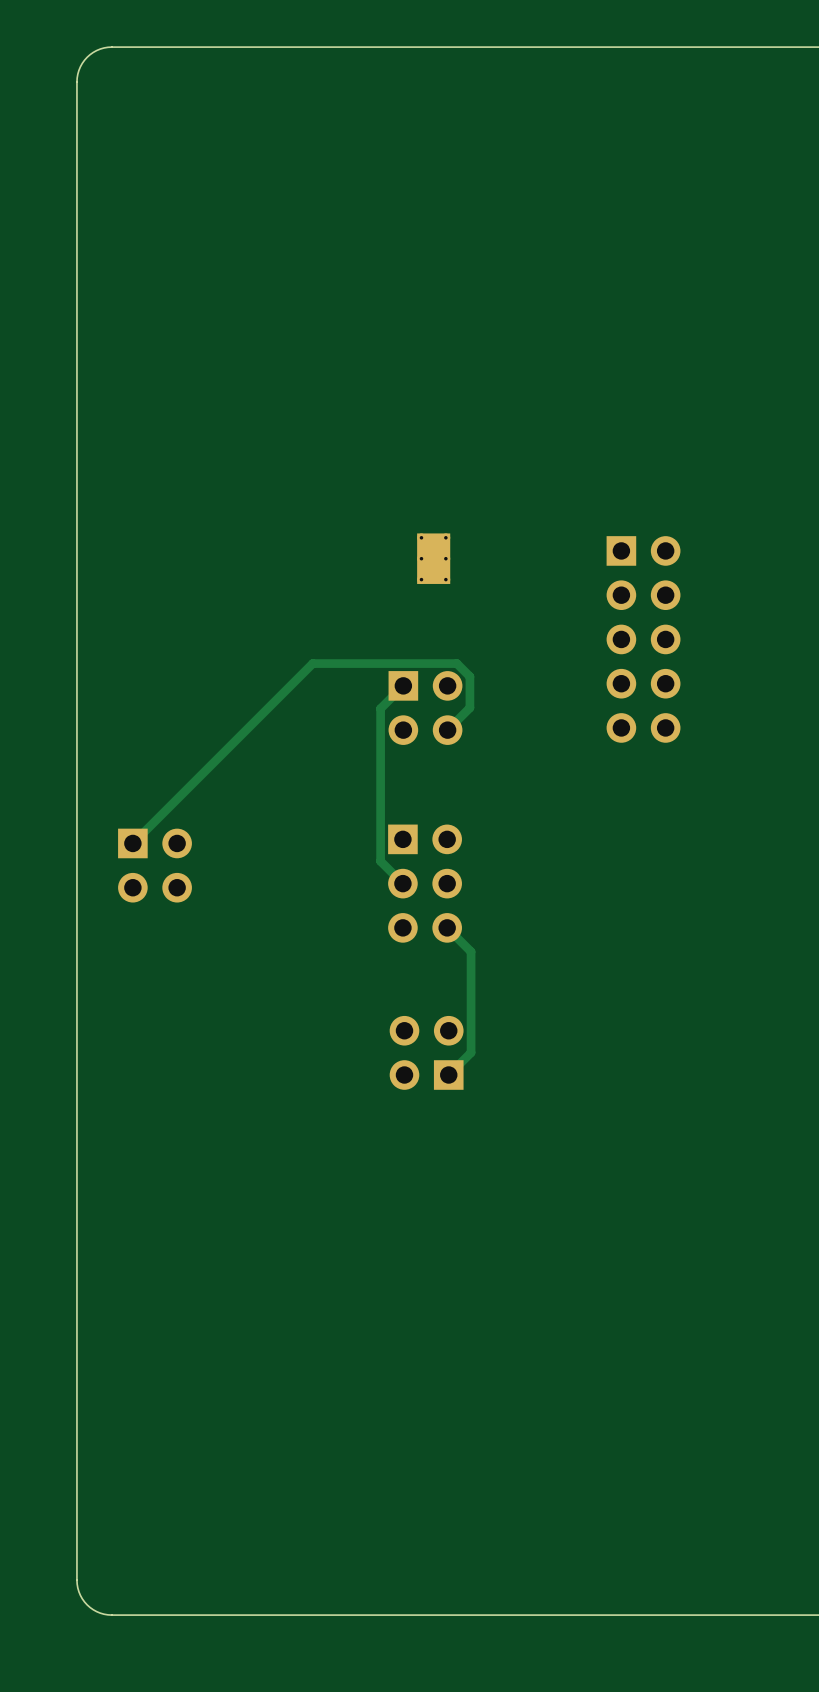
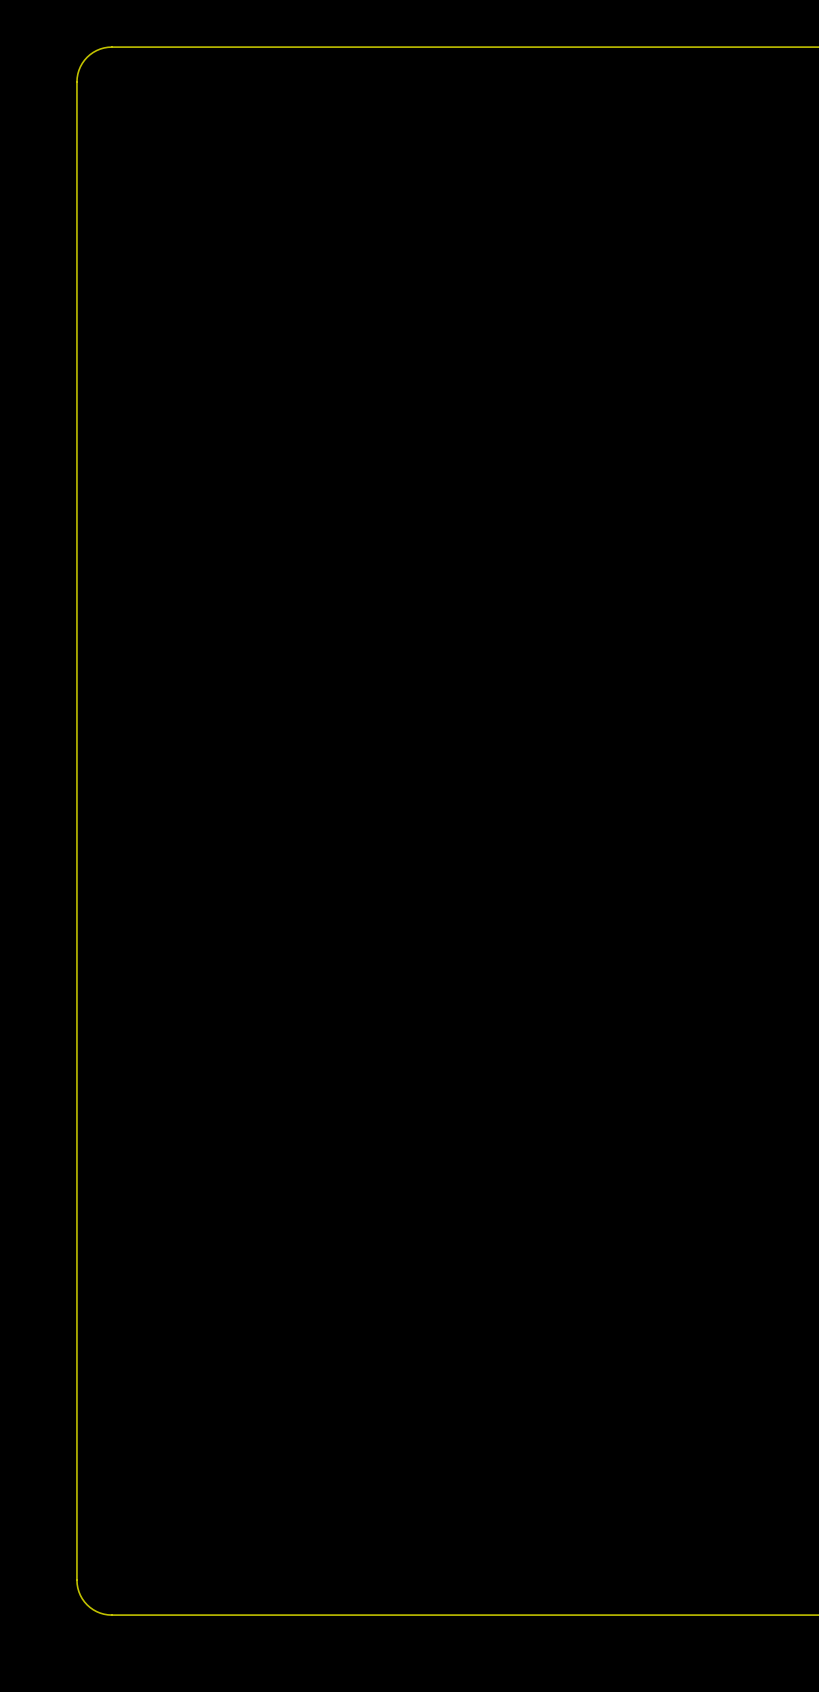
part: (433, 558) -> none
part: (643, 639) -> none
track: (403, 685) (380, 708) (380, 861) (402, 883) -> none
part: (425, 708) -> none
track: (447, 730) (469, 707) (469, 676) (456, 663) (312, 663) (132, 843) -> none
part: (155, 865) -> none
part: (425, 883) -> none
track: (447, 927) (471, 951) (471, 1052) (448, 1075) -> none
part: (426, 1052) -> none

